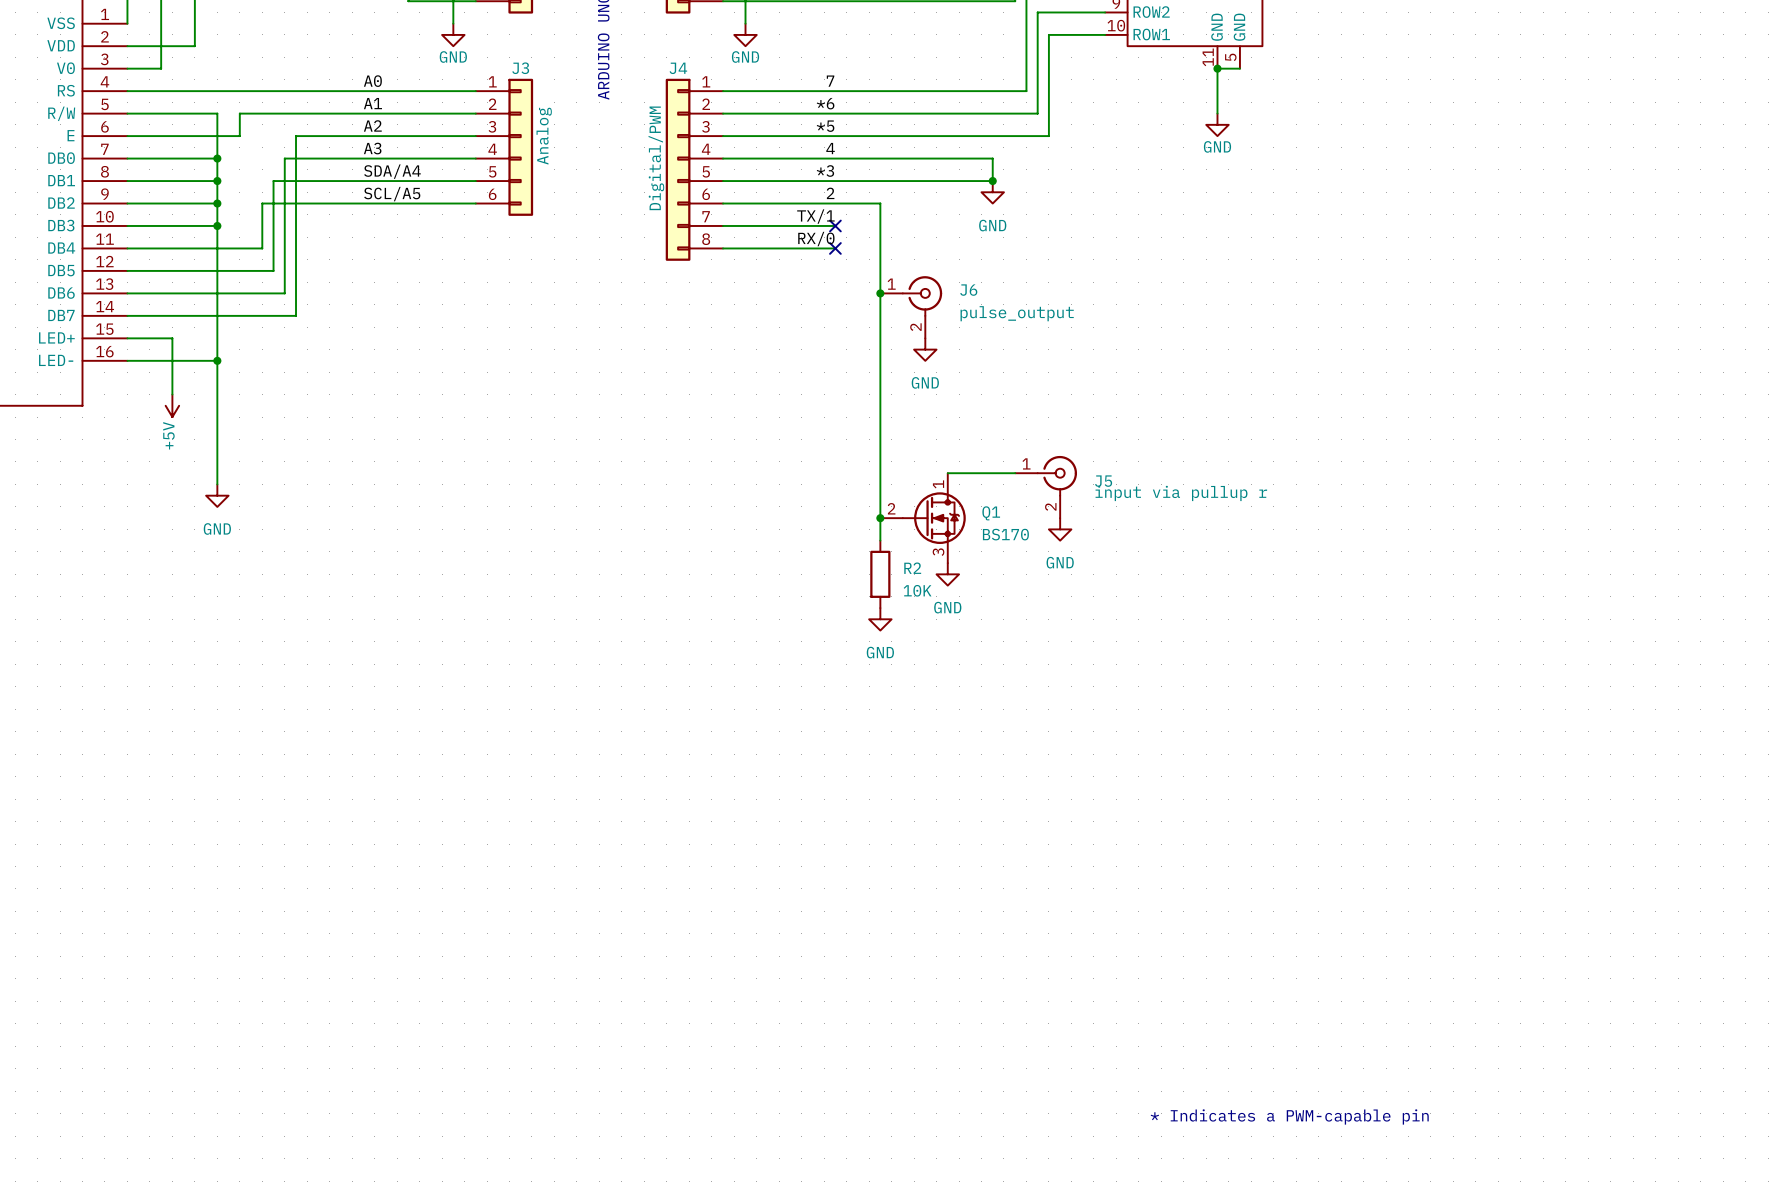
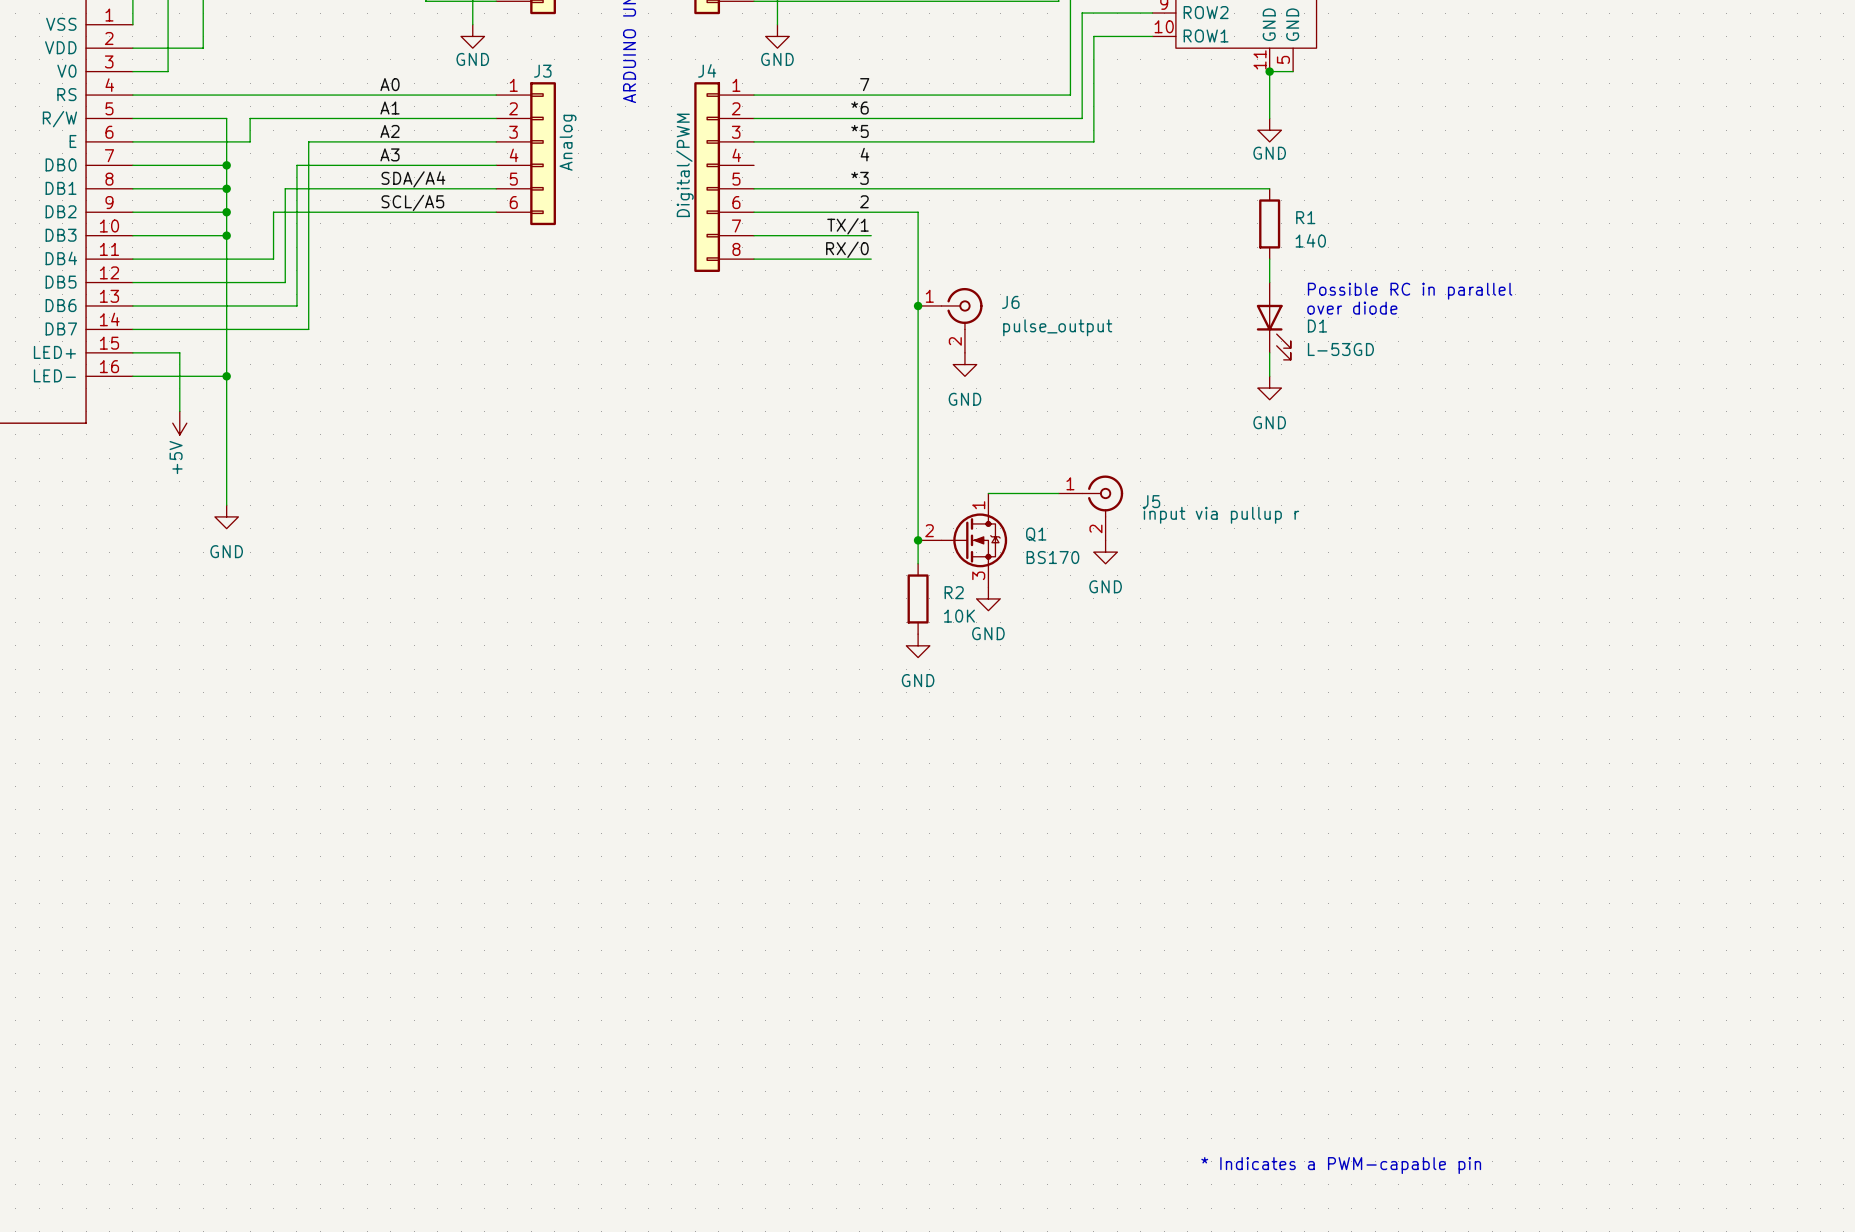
wire: (723, 158) (992, 158) (992, 181) -> (1269, 188) (1035, 188)
junction: (992, 181) -> none
power symbol: GND (992, 192) -> none
R1: none -> 140 (1269, 223)
no-connect mark: (835, 225) -> none
no-connect mark: (835, 248) -> none
wire: none -> (1269, 259) (1269, 282)
text: none -> Possible RC in parallel (1410, 291)
text: none -> over diode (1352, 308)
D1: none -> L-53GD (1273, 321)
wire: none -> (1269, 352) (1269, 376)
power symbol: none -> GND (1269, 388)

